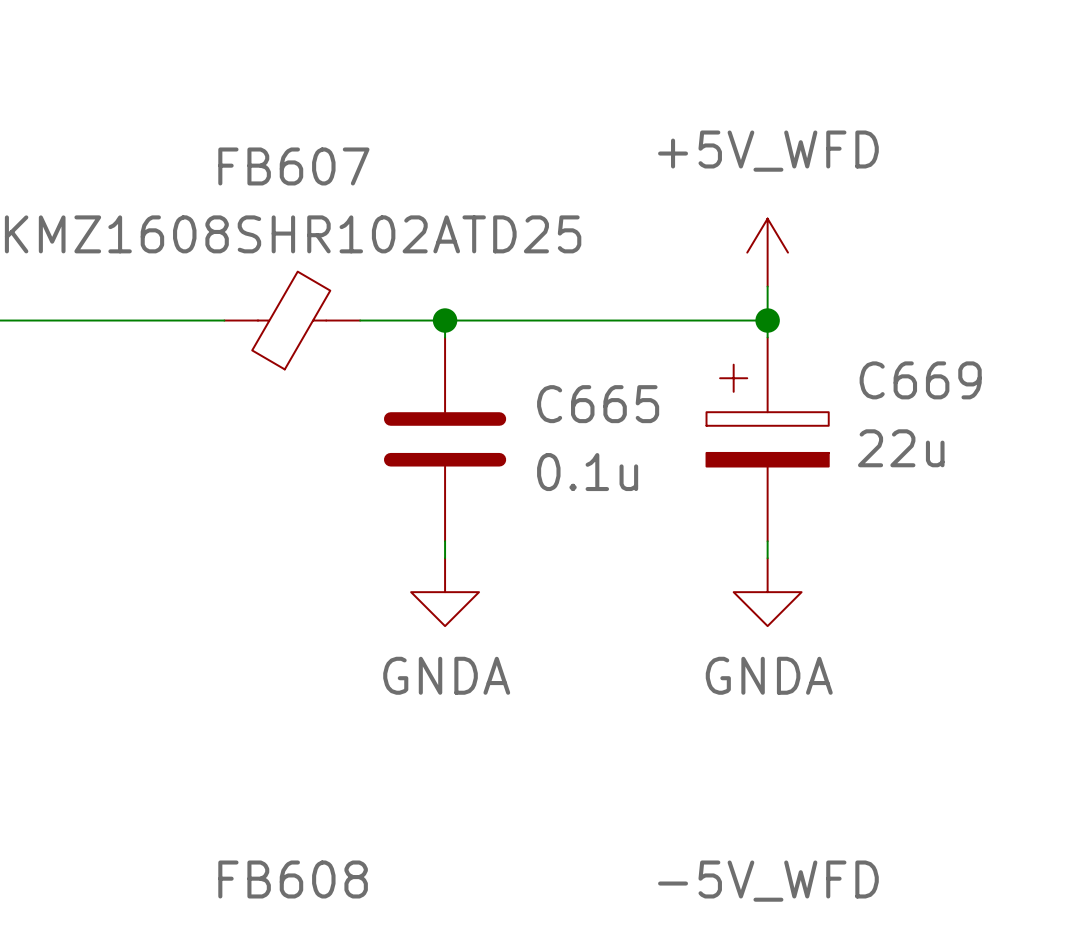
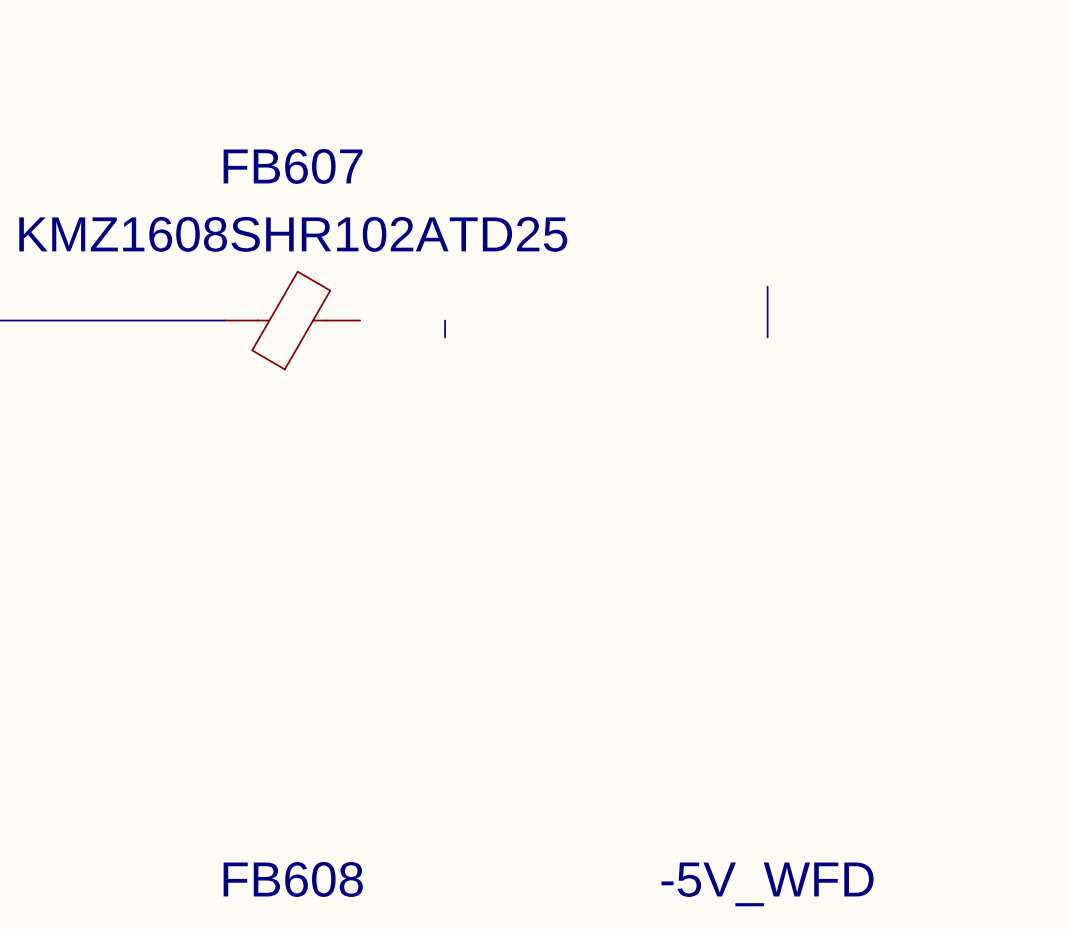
power symbol: +5V_WFD (767, 252) -> none
wire: (360, 320) (767, 320) -> none
junction: (445, 320) -> none
junction: (767, 320) -> none
C665: 0.1u (445, 439) -> none
C669: 22u (767, 439) -> none
wire: (445, 541) (445, 558) -> none
wire: (767, 541) (767, 558) -> none
power symbol: GNDA (445, 592) -> none
power symbol: GNDA (767, 592) -> none

